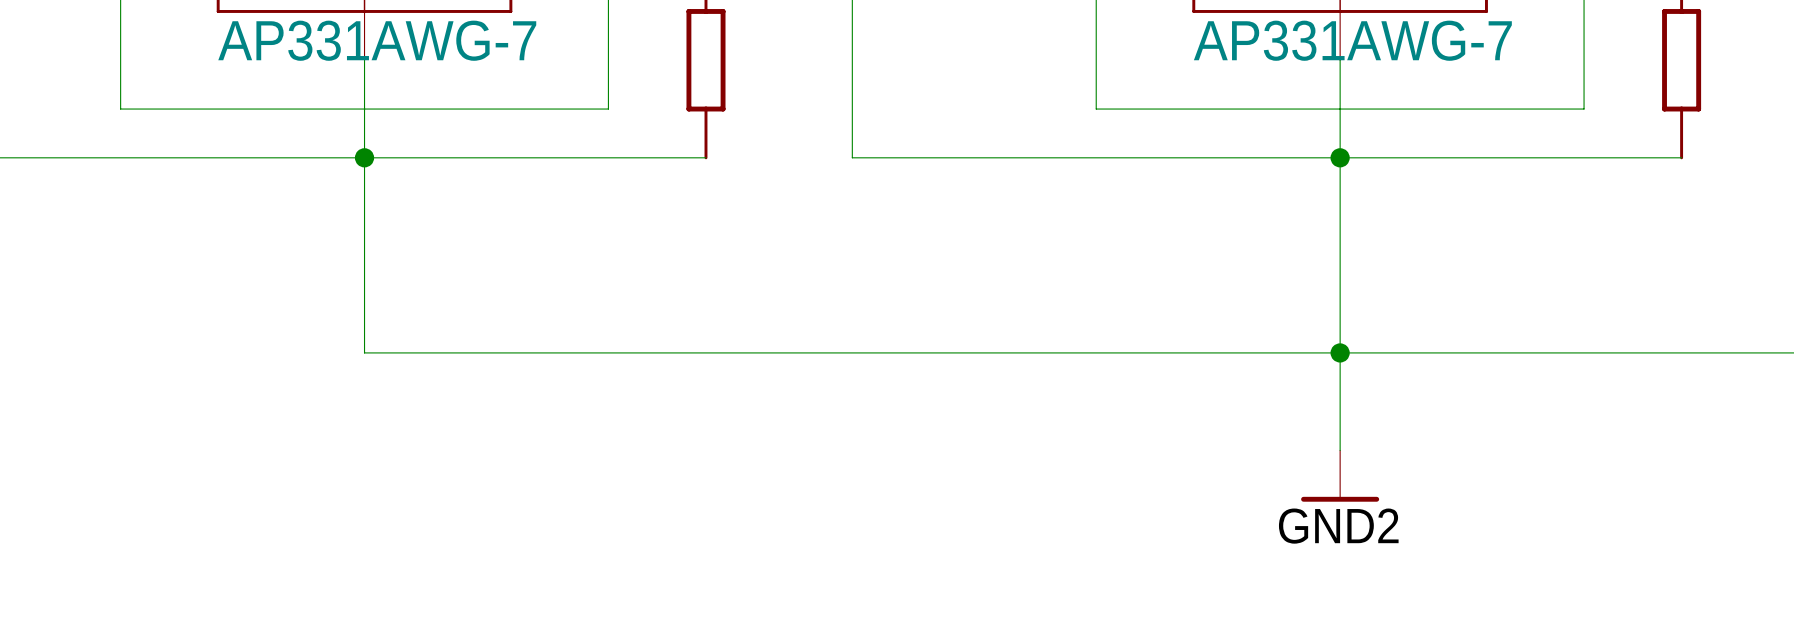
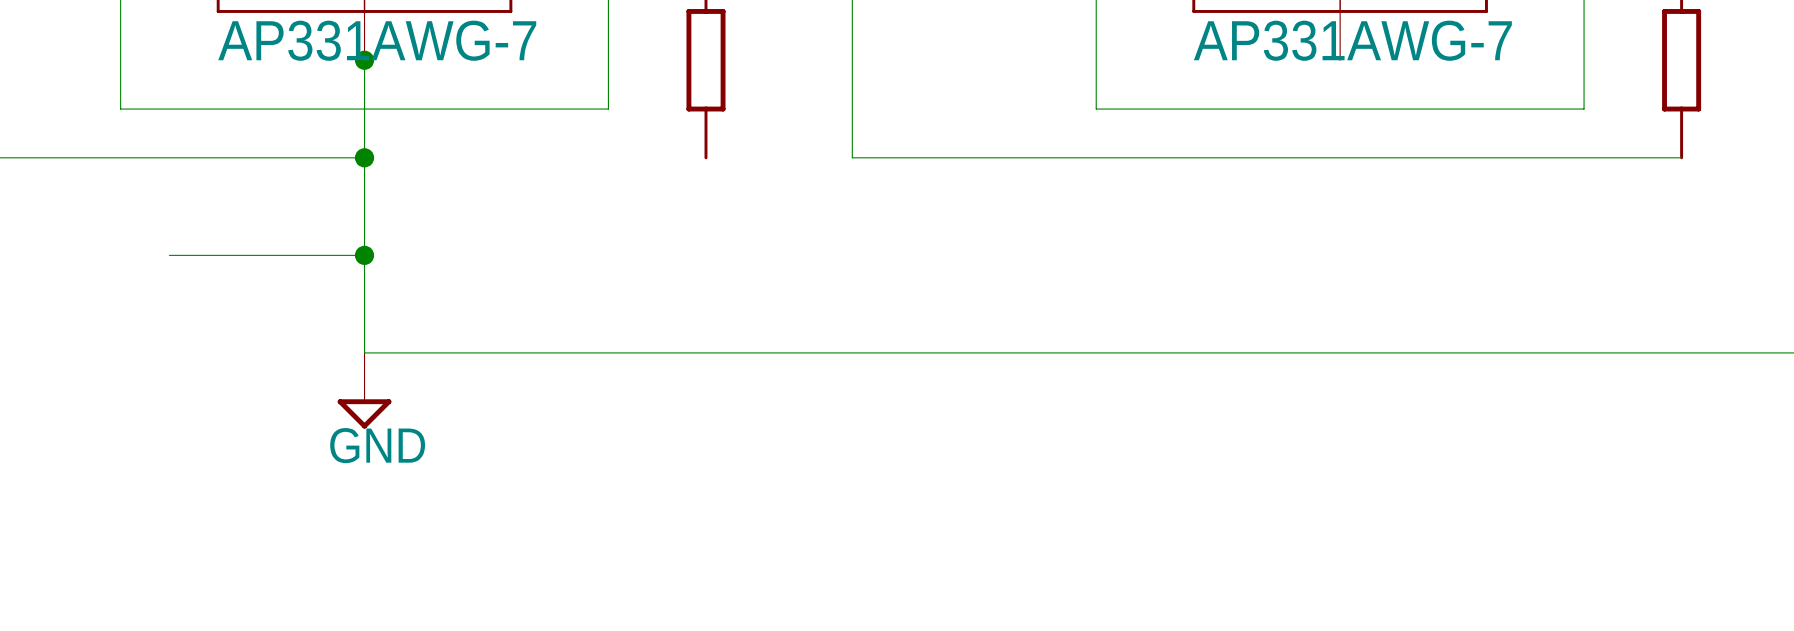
junction: none -> (364, 60)
wire: (1340, 60) (1340, 450) -> none
wire: (364, 157) (705, 157) -> none
junction: (1340, 157) -> none
wire: none -> (169, 255) (364, 255)
junction: none -> (364, 255)
junction: (1340, 352) -> none
power symbol: none -> GND (364, 390)
power symbol: (1340, 476) -> none
label: GND2 (1338, 526) -> none

